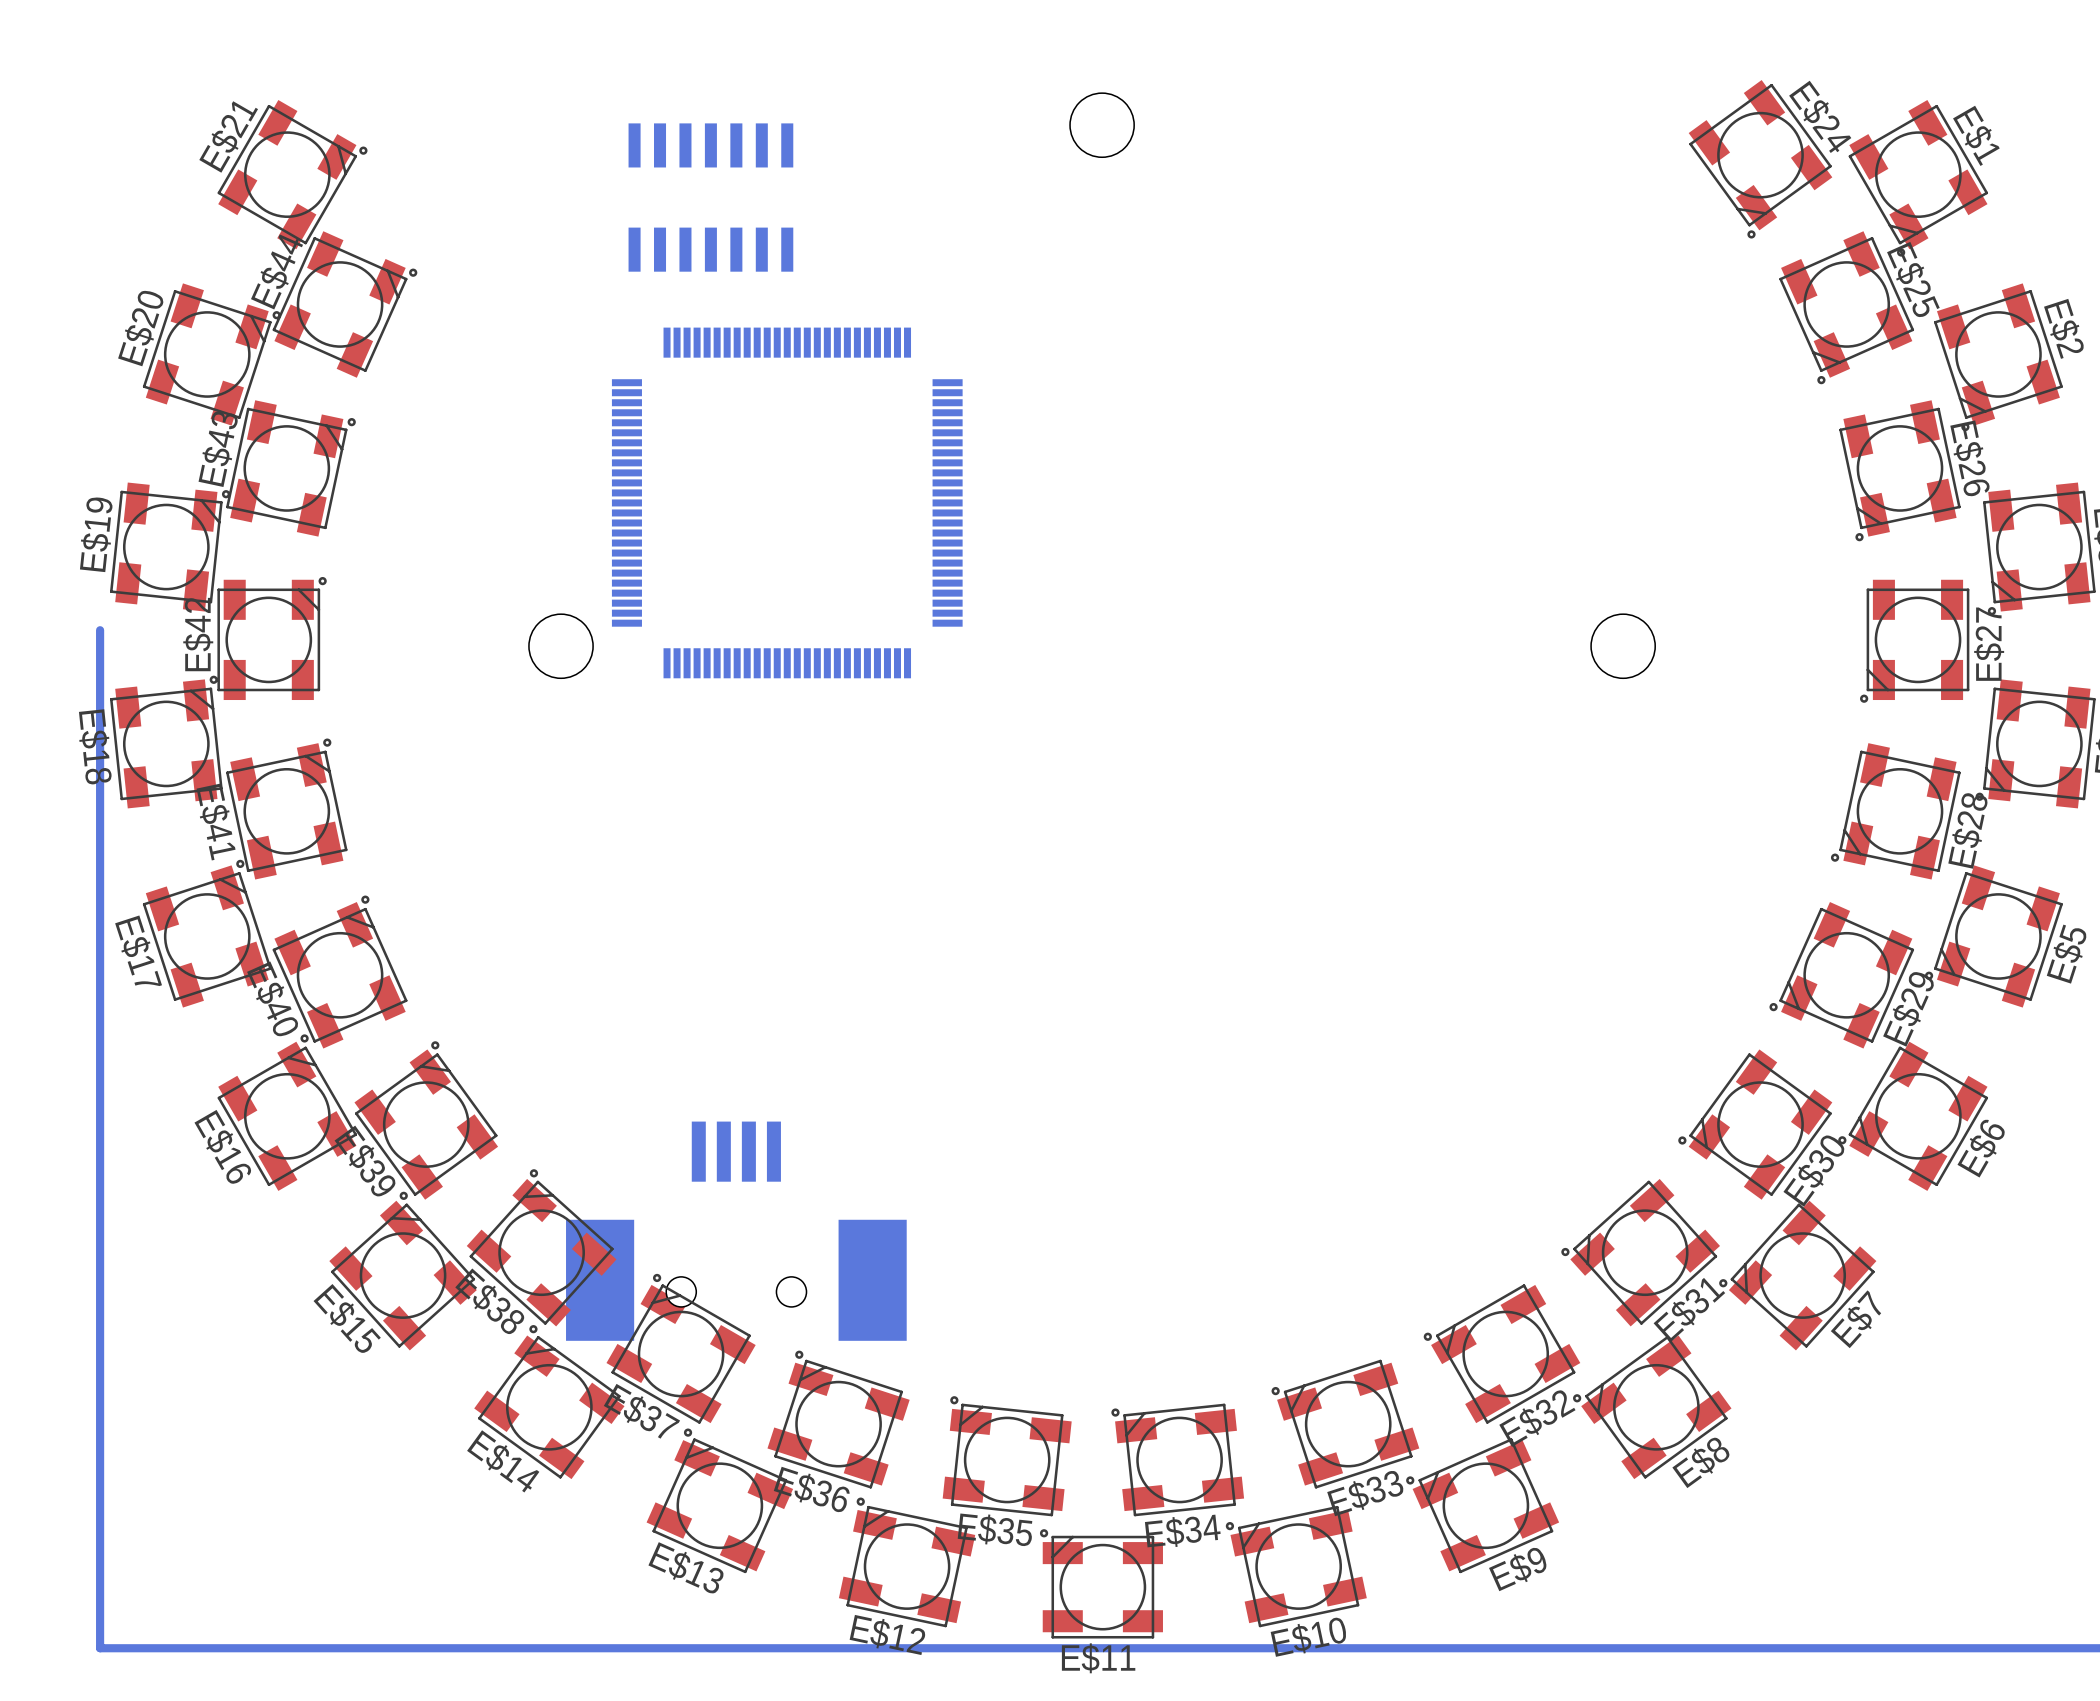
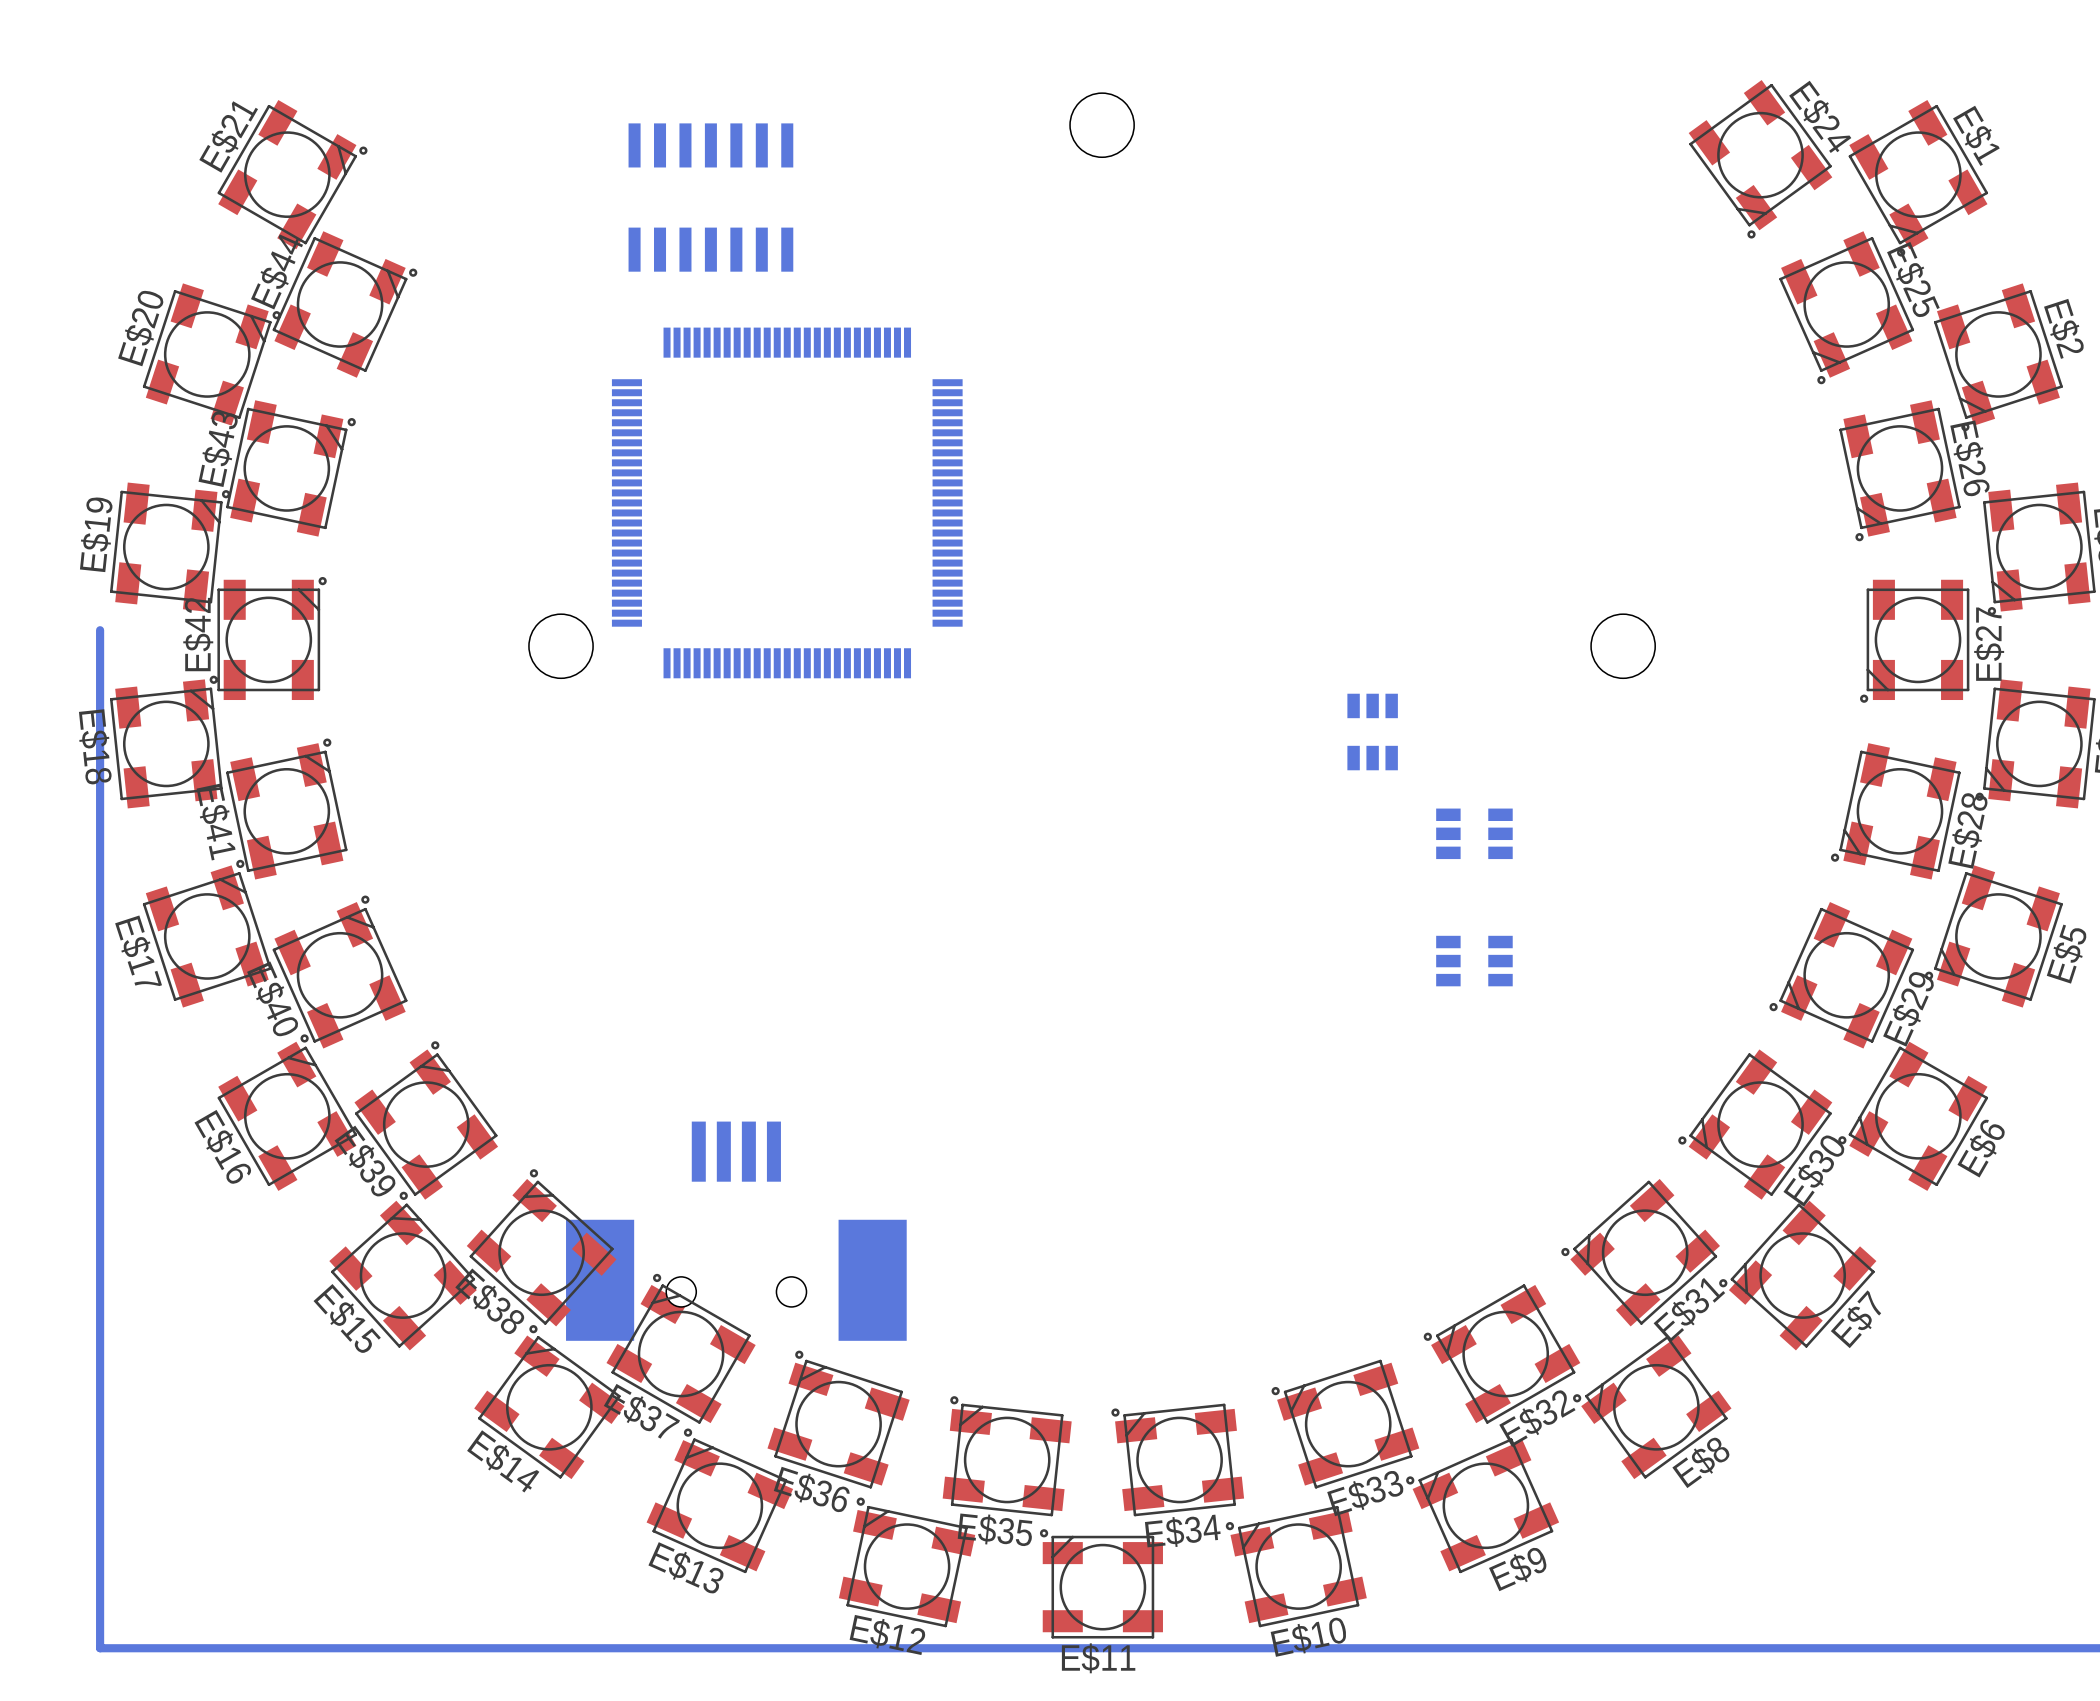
part: none -> (1372, 732)
part: none -> (1474, 833)
part: none -> (1474, 961)

